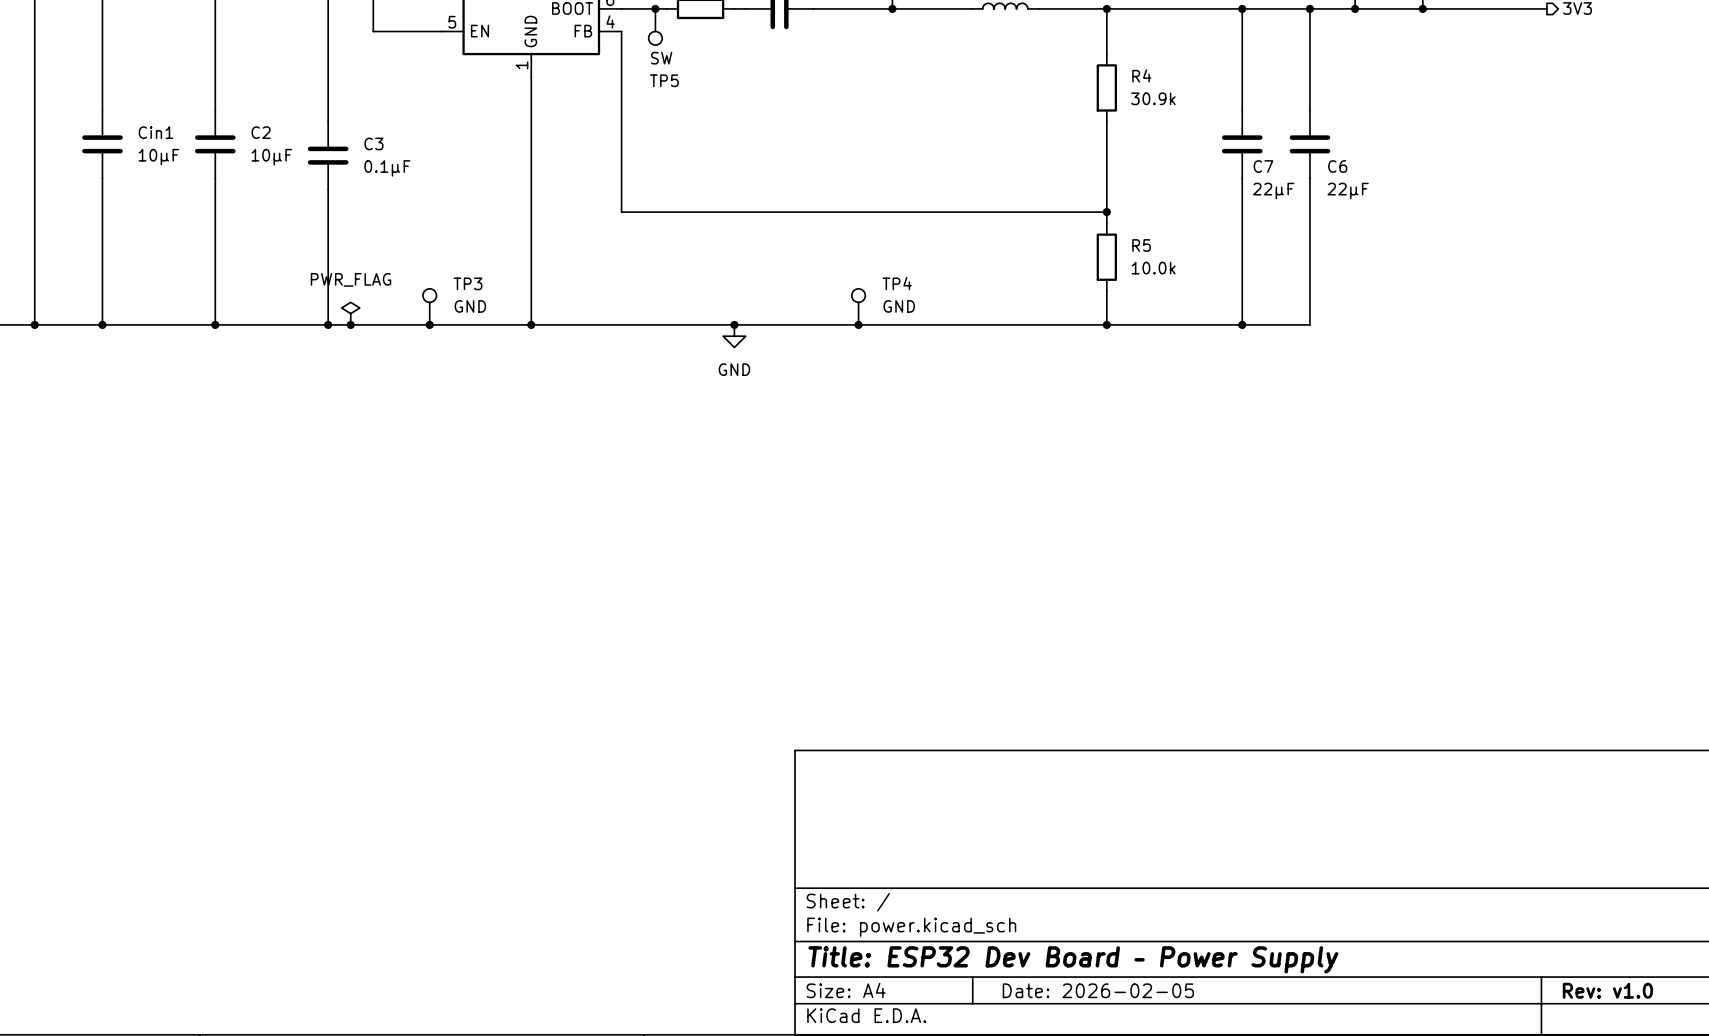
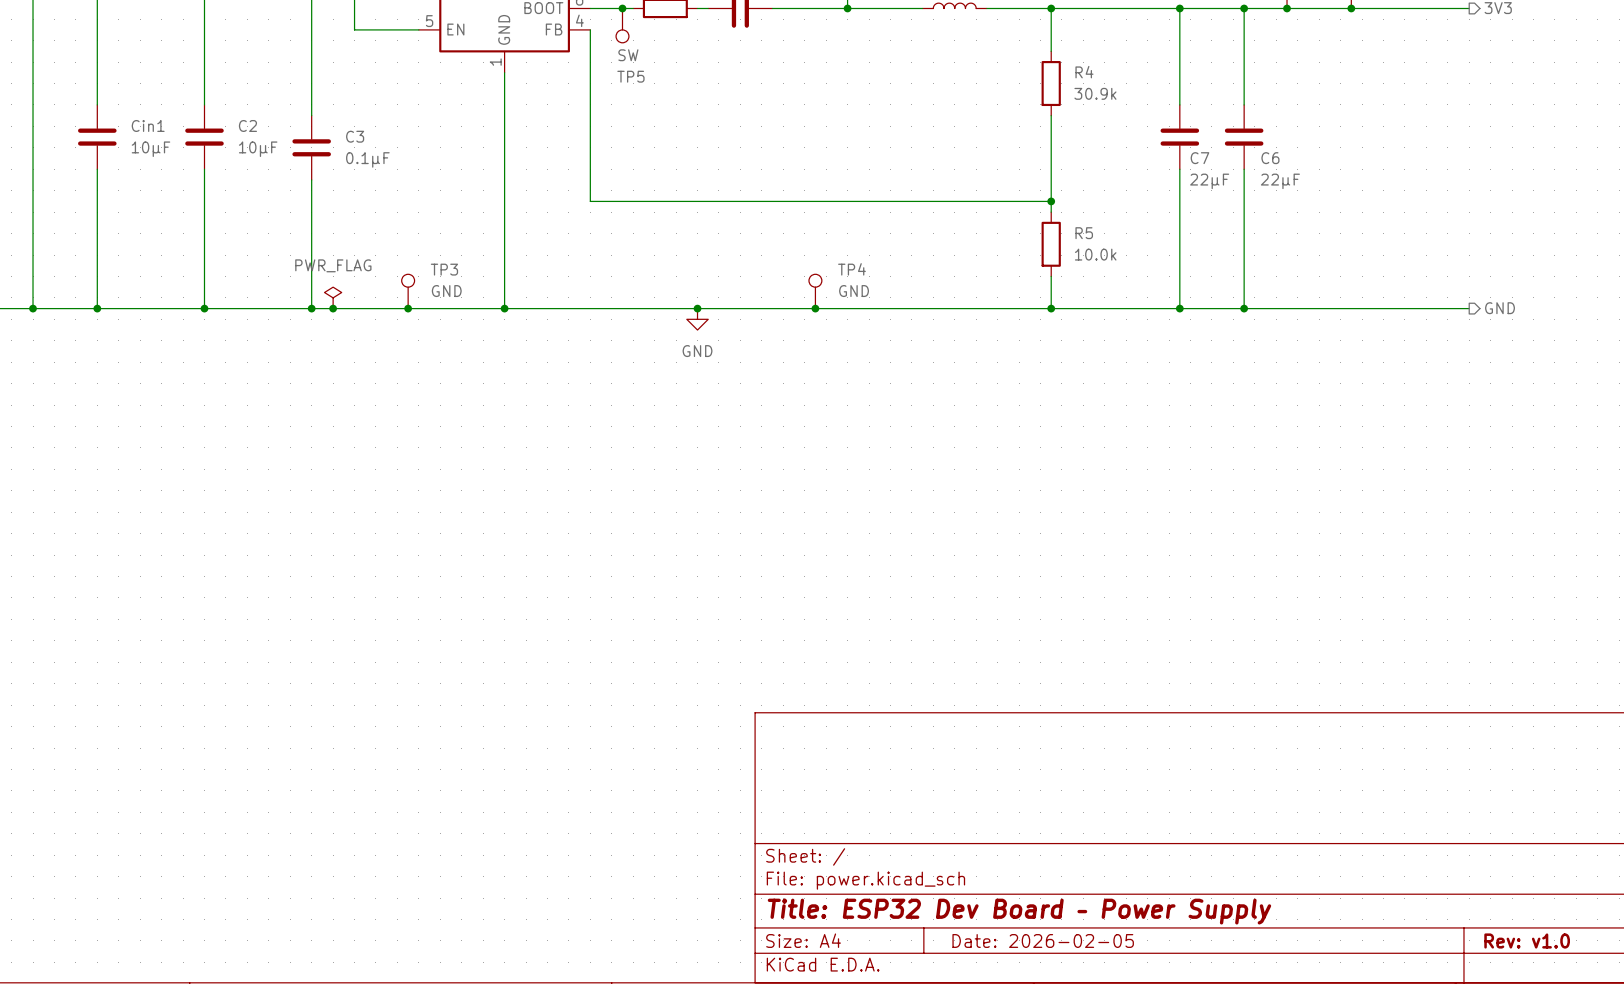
wire: none -> (1244, 308) (1469, 308)
junction: none -> (1244, 308)
hierarchical label: none -> GND (1500, 308)

